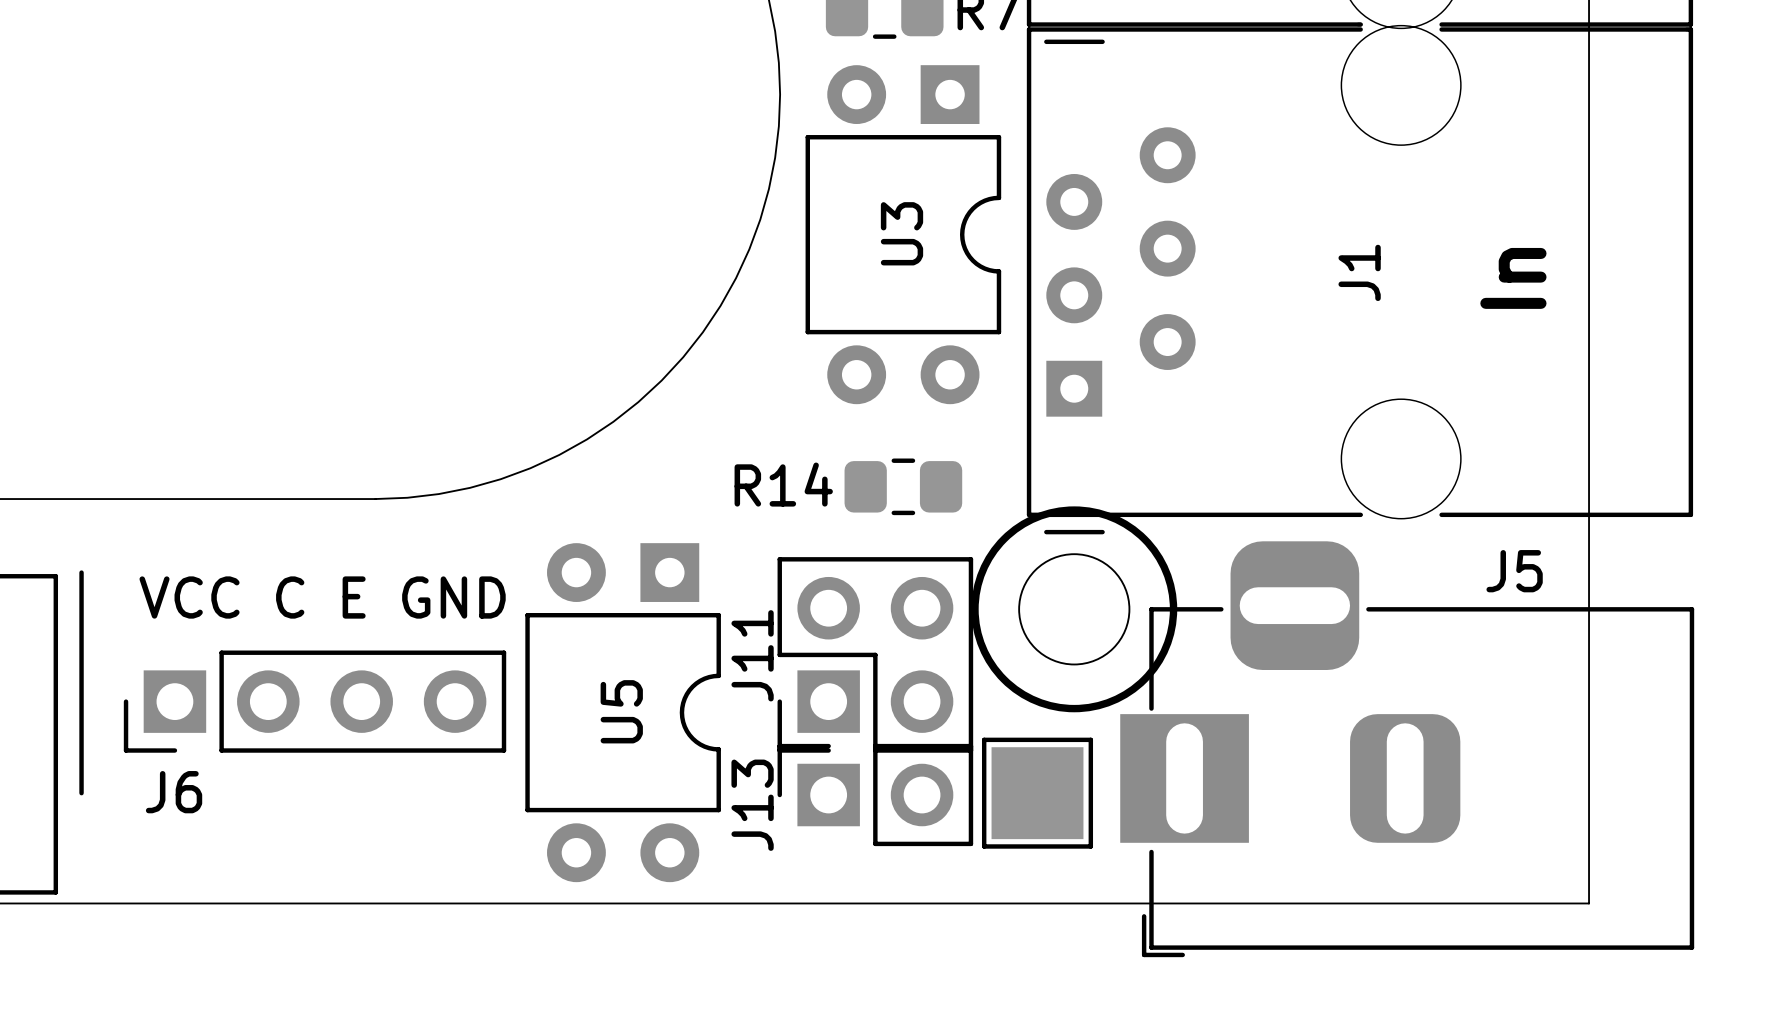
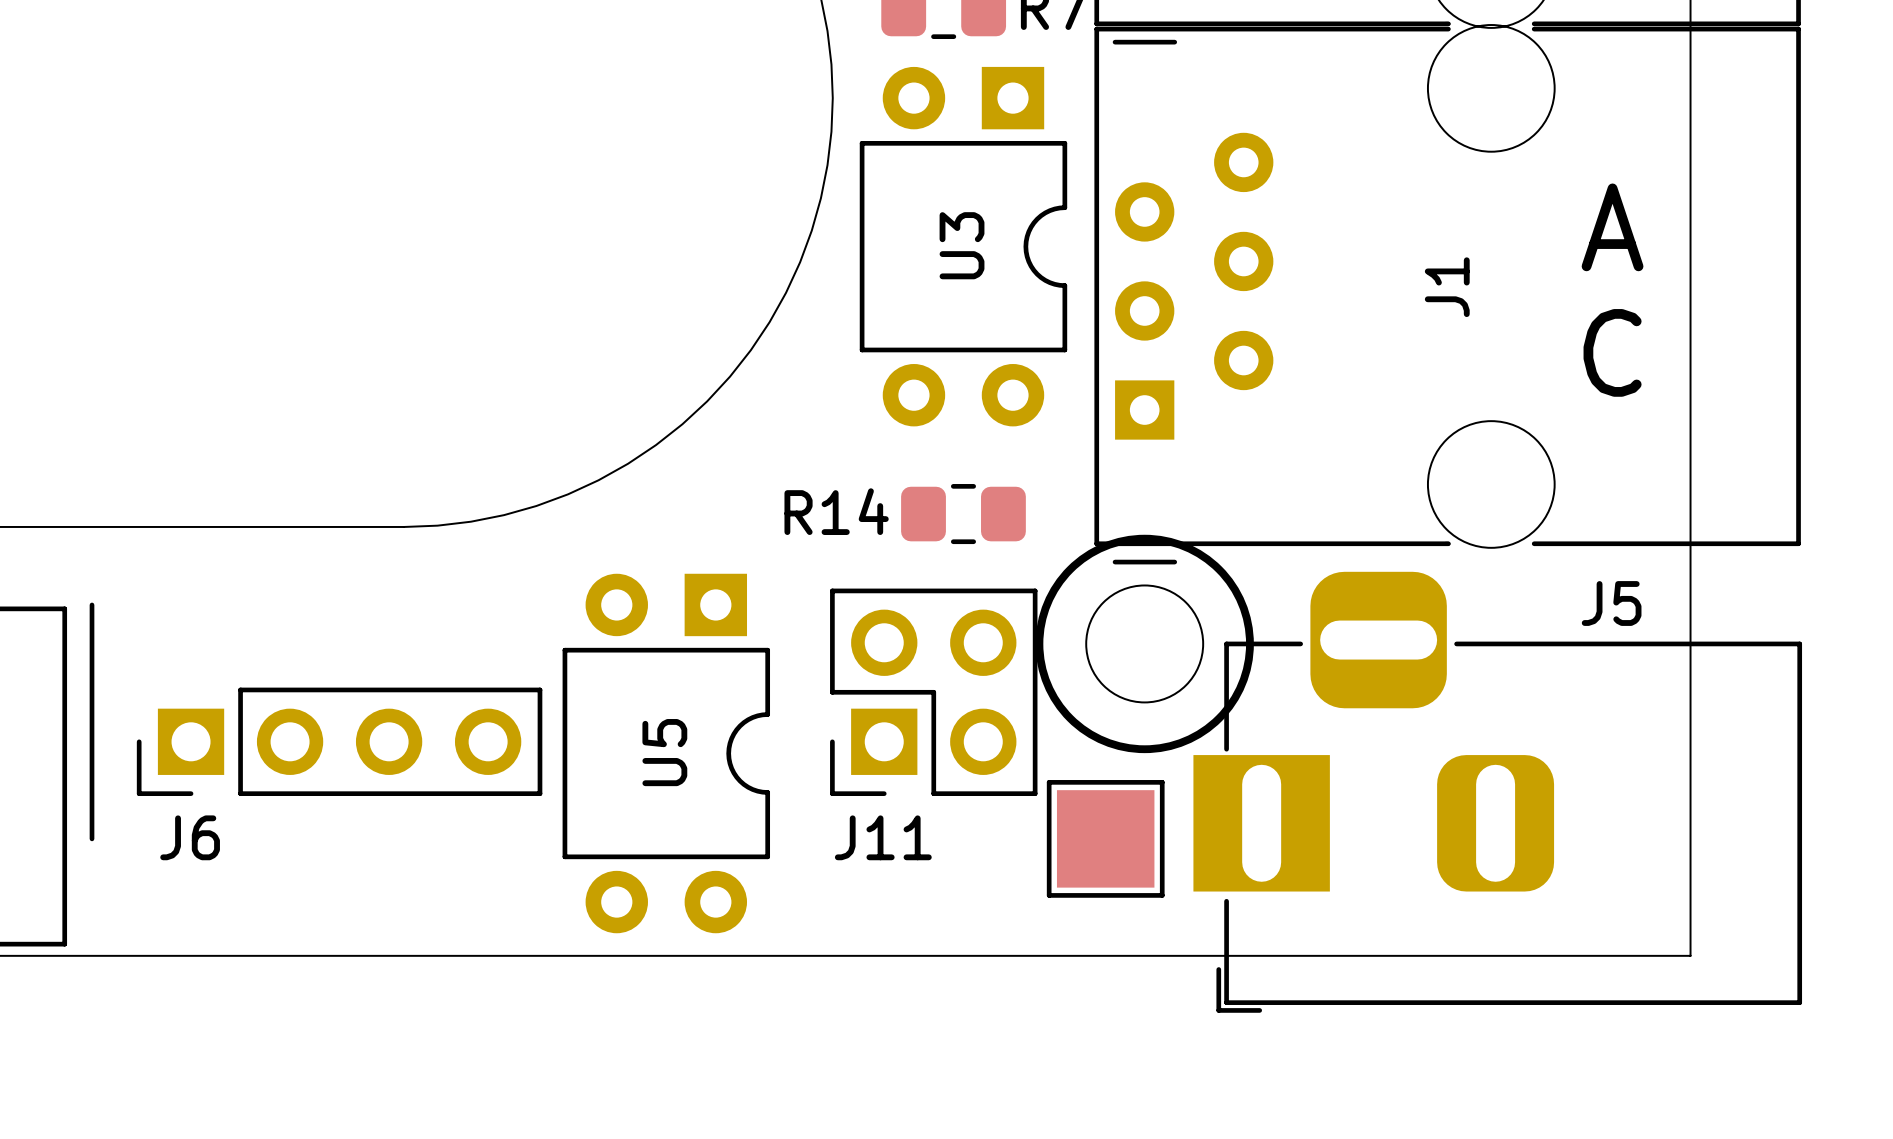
text: none -> A (1612, 227)
text: In (1513, 278) -> none
text: none -> C (1612, 352)
text: VCC C E GND (322, 597) -> none
J11 name rotation: 0° (752, 655) -> 90° clockwise (883, 837)
J11 name position: J11 (752, 655) -> J11 (883, 837)
J13: (875, 795) -> none

